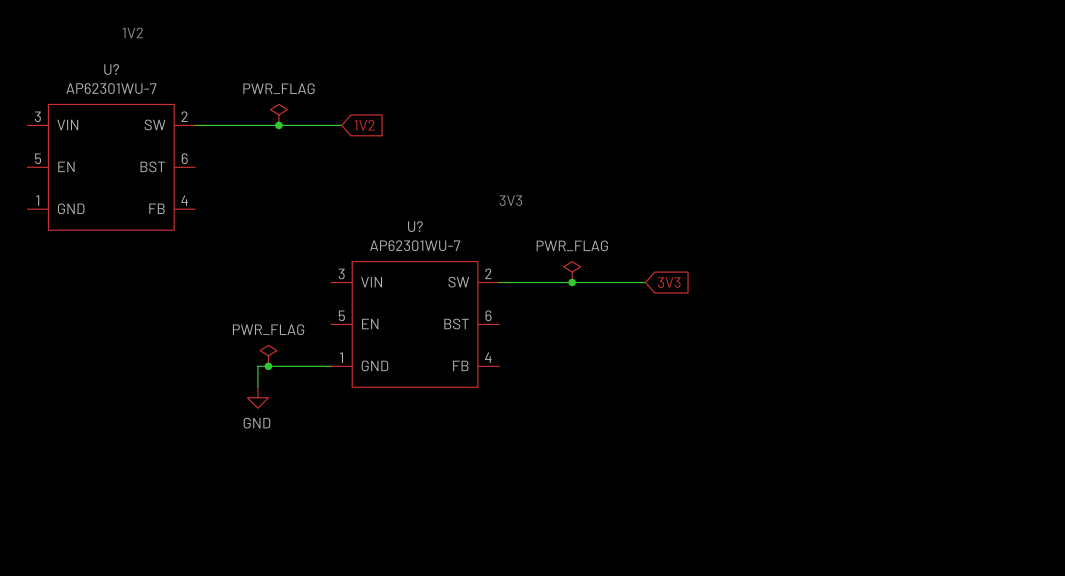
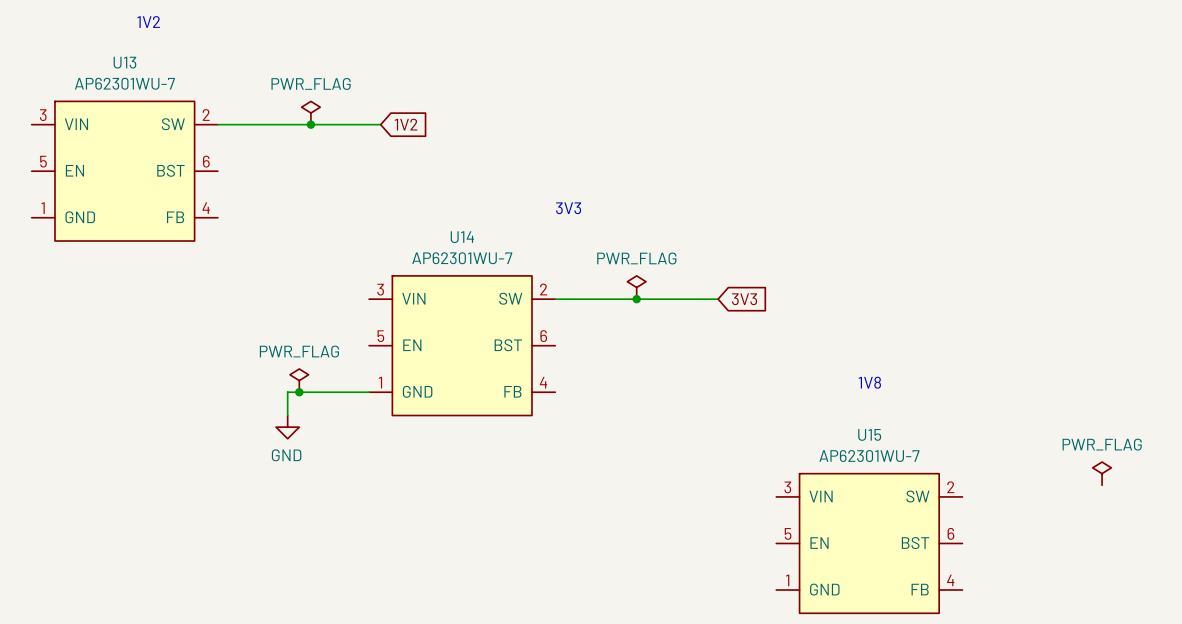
U? name: U? (111, 69) -> U13 (124, 62)
U? name: U? (415, 226) -> U14 (462, 237)
text: none -> 1V8 (869, 382)
power symbol: none -> PWR_FLAG (1102, 473)
U15: none -> AP62301WU-7 (869, 543)

